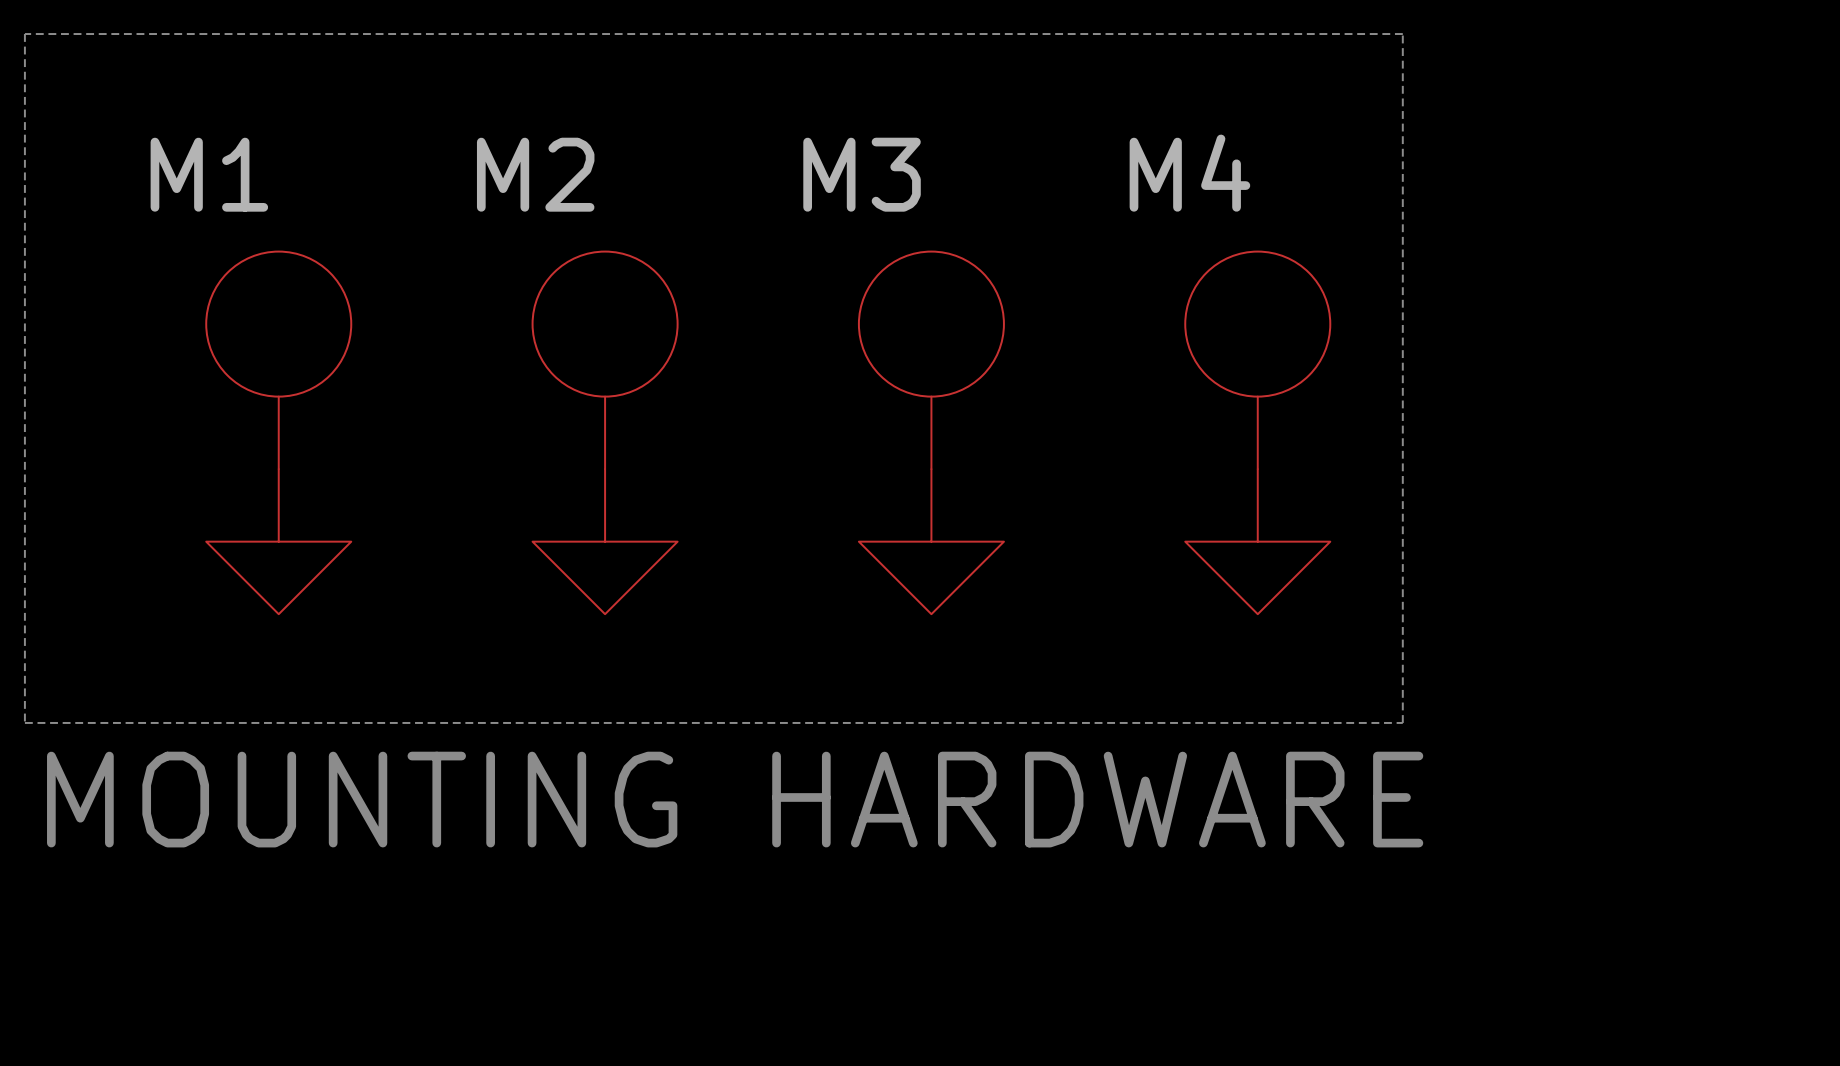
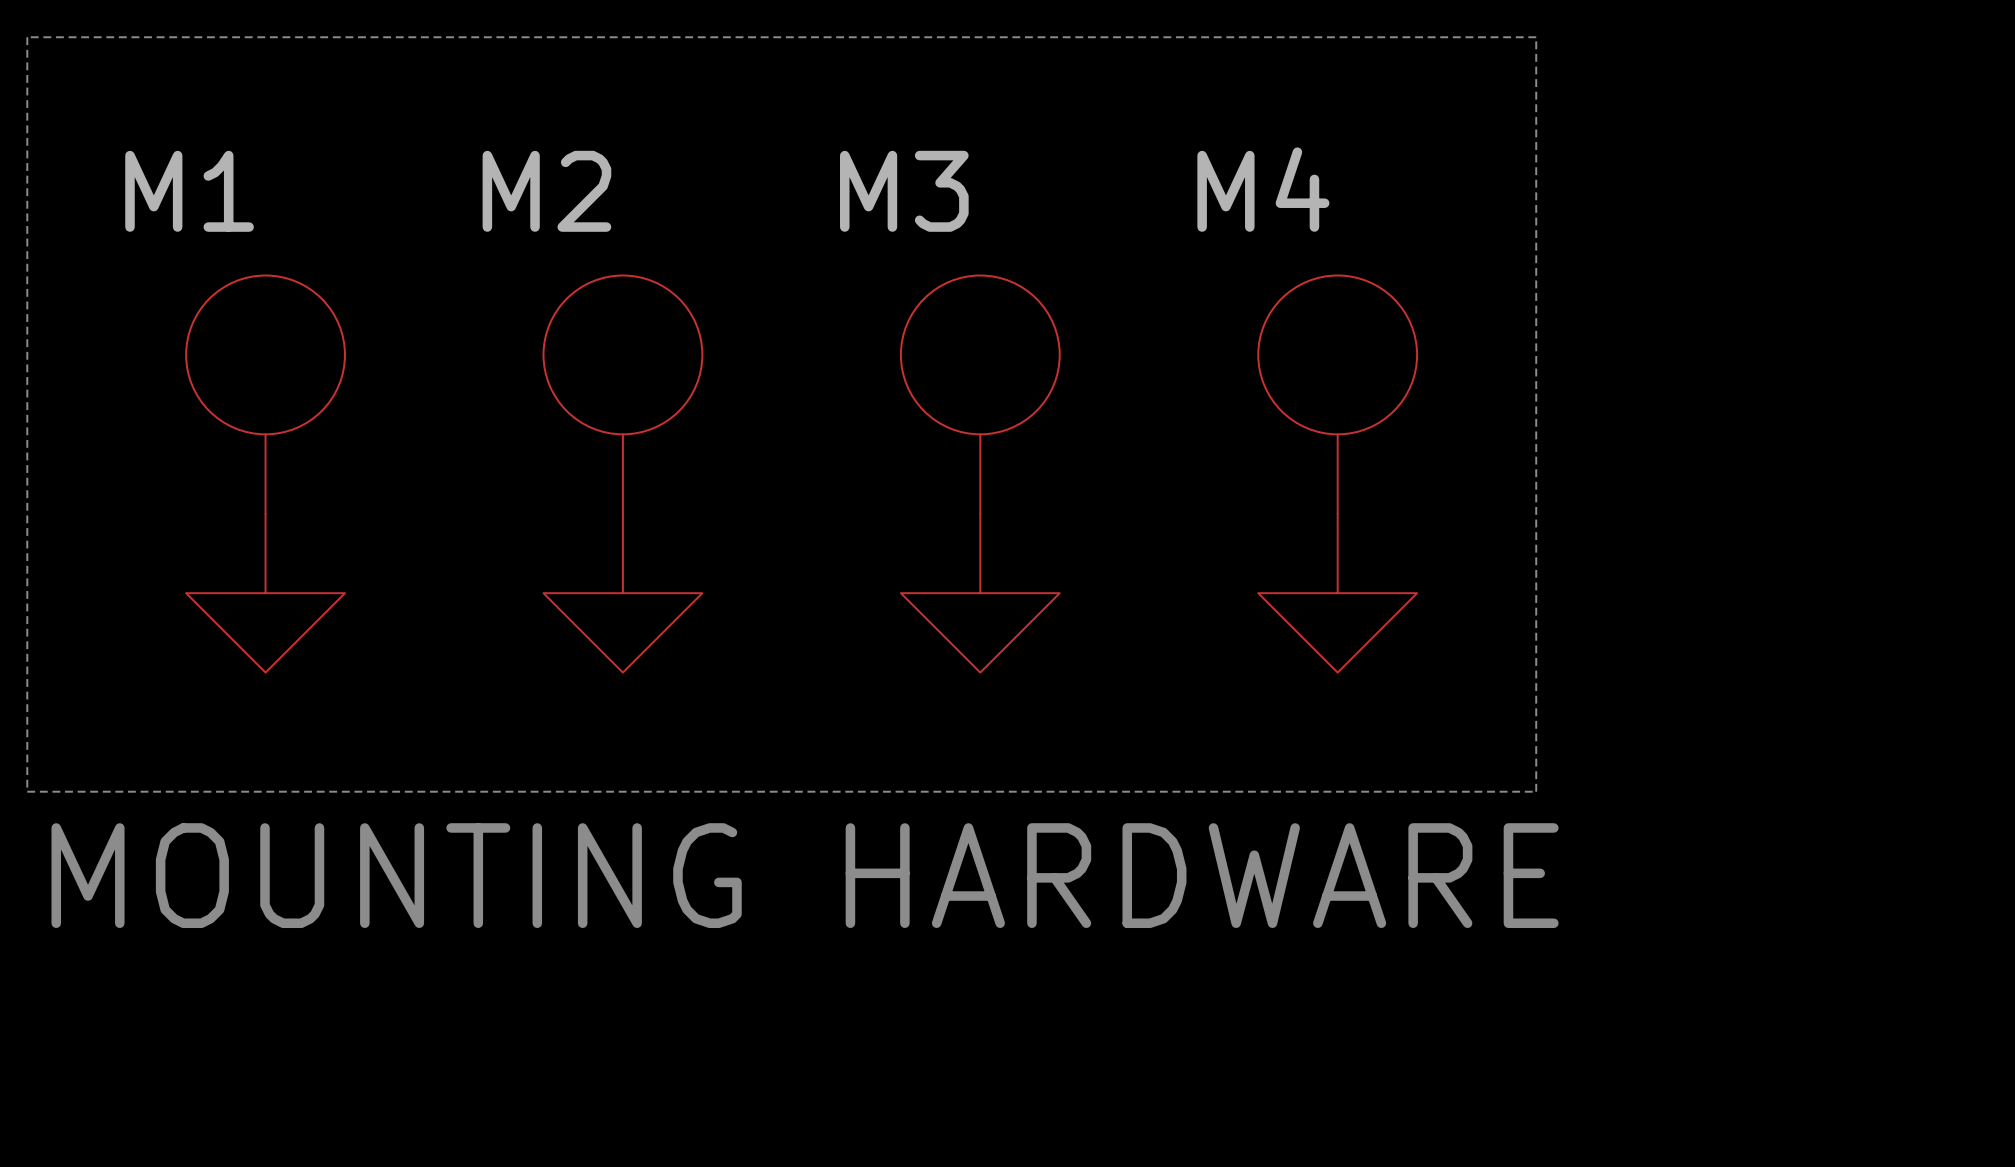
M1 position: (278, 360) -> (265, 394)
M2 position: (605, 360) -> (622, 394)
M3 position: (931, 360) -> (980, 394)
M4 position: (1257, 360) -> (1337, 394)
power symbol position: (278, 541) -> (265, 593)
power symbol position: (605, 541) -> (622, 593)
power symbol position: (931, 541) -> (980, 593)
power symbol position: (1257, 541) -> (1337, 593)

